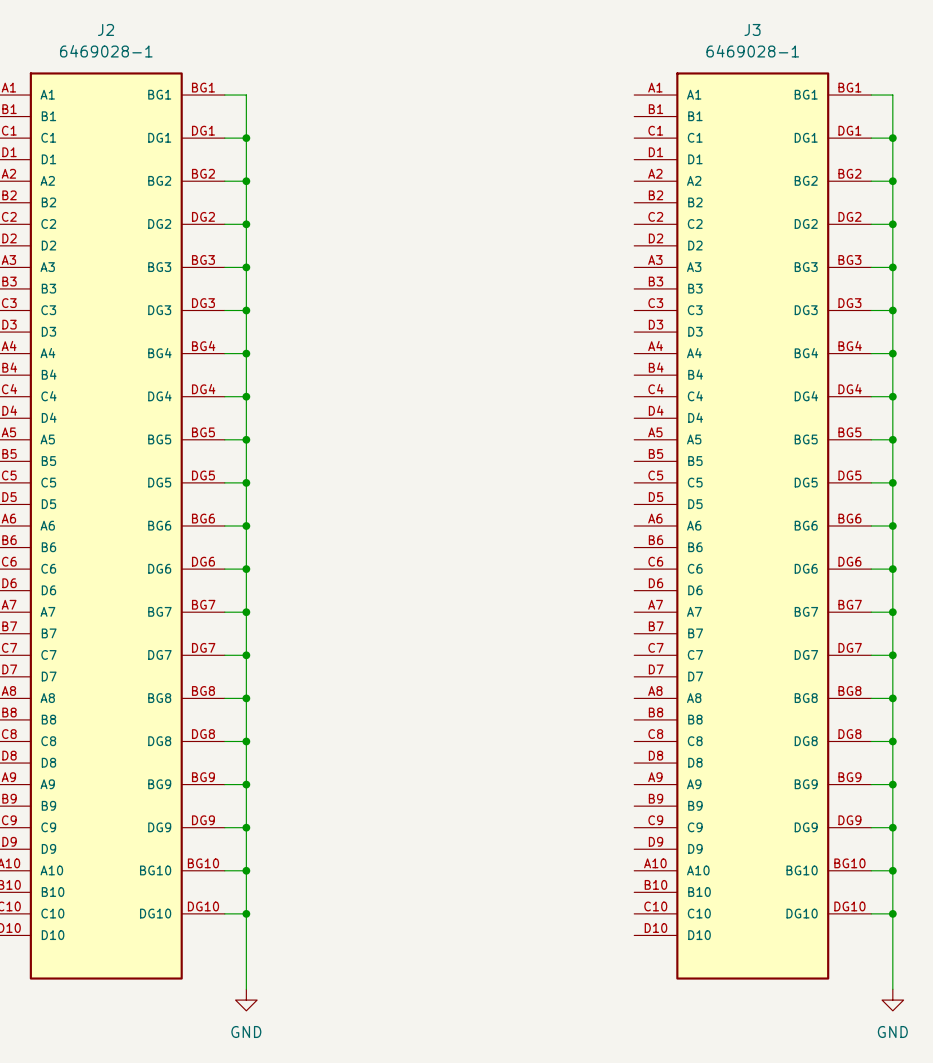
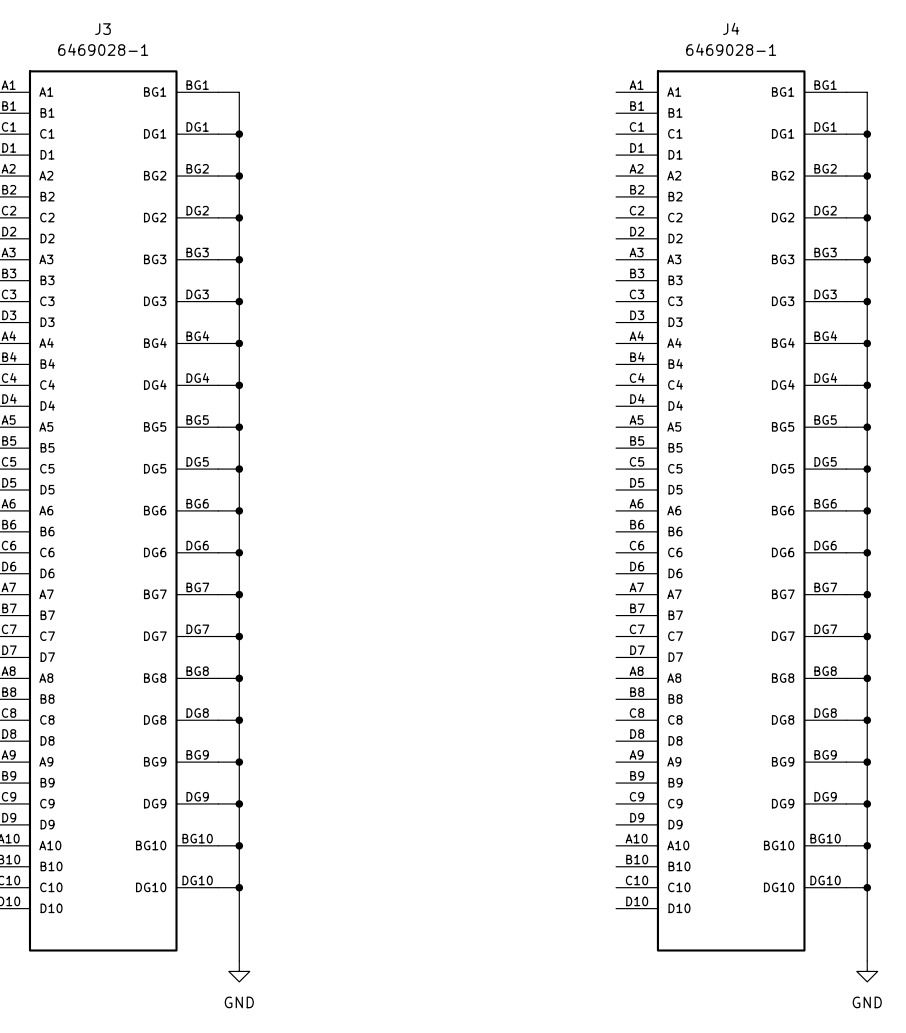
J2 name: J2 (106, 29) -> J3 (102, 29)
J3 name: J3 (752, 29) -> J4 (731, 28)

